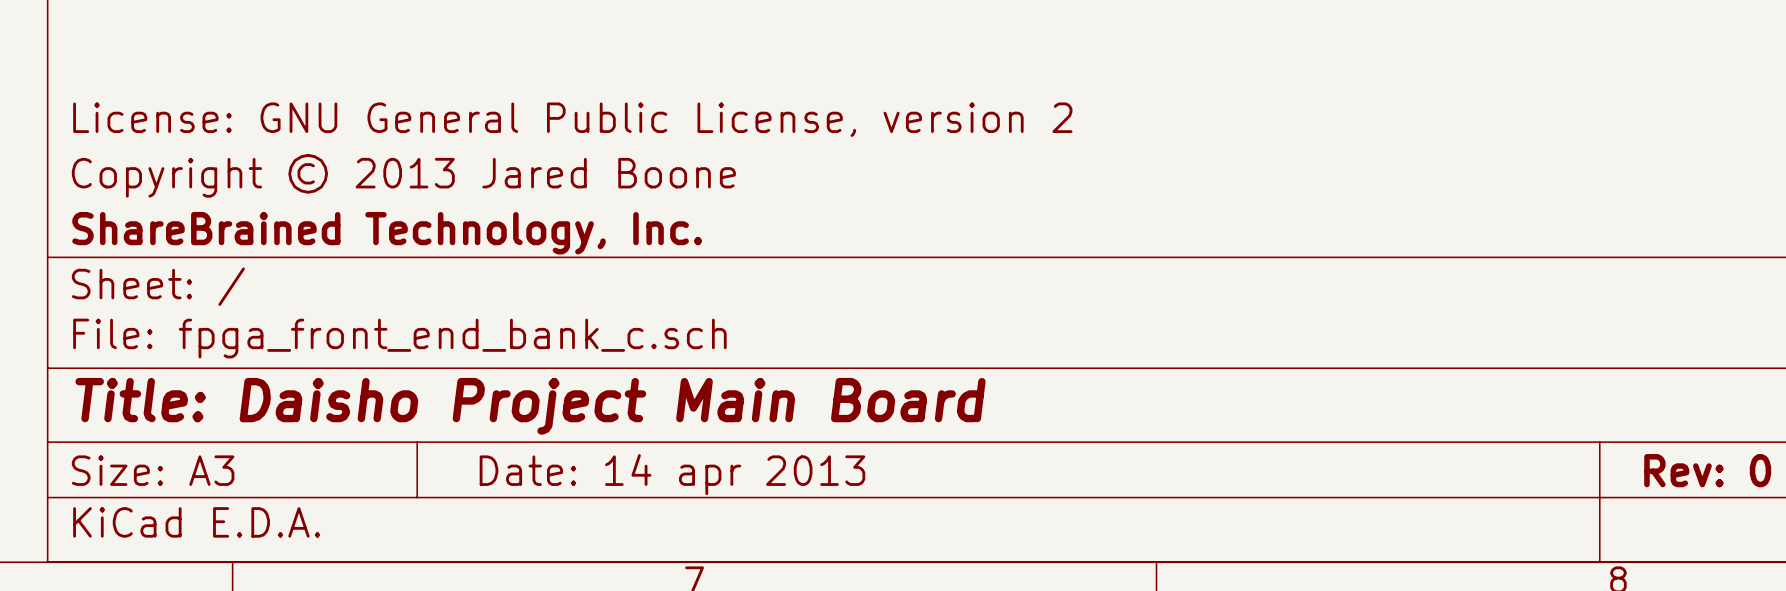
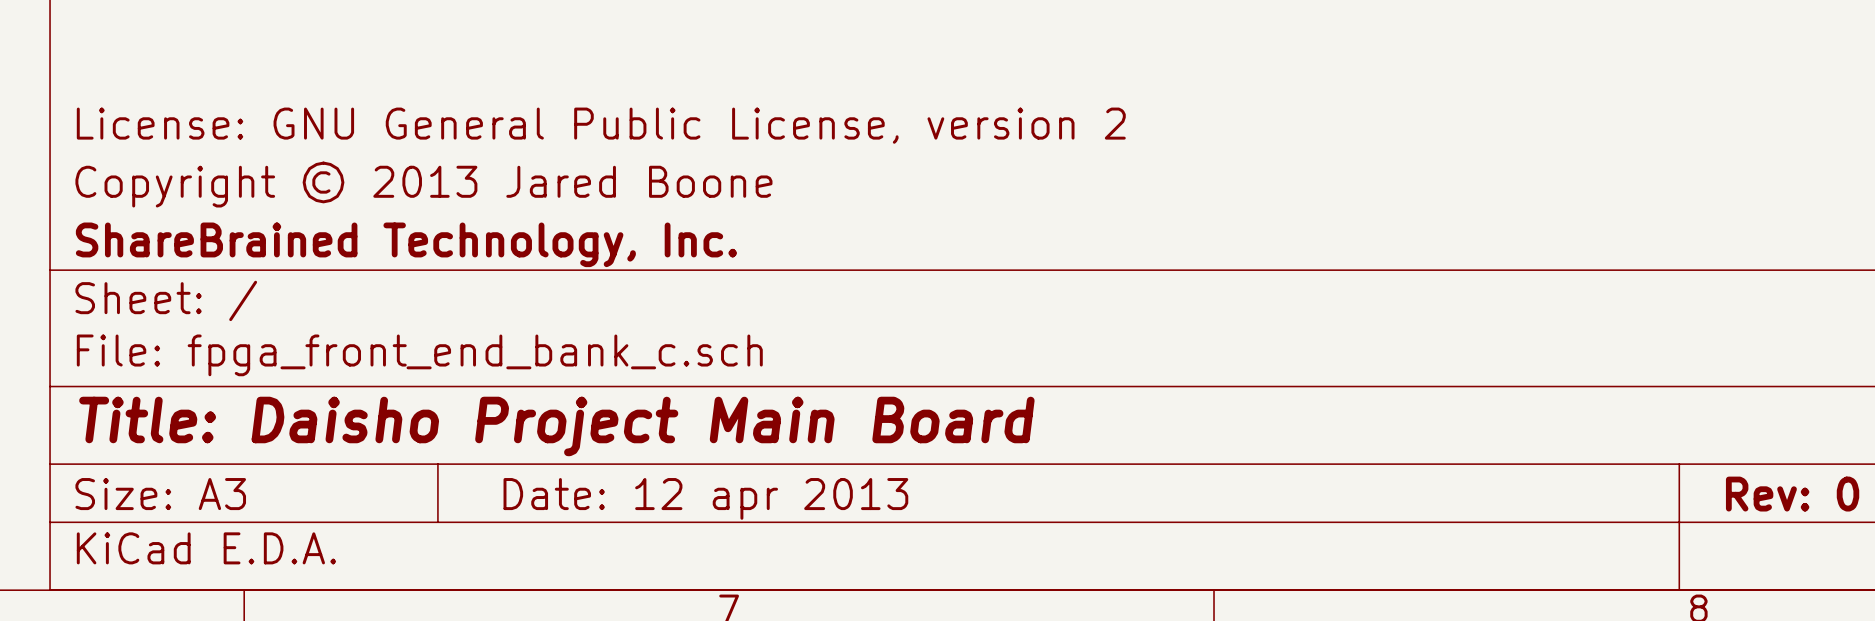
title block: Date: 14 apr 2013 (672, 474) -> Date: 12 apr 2013 (705, 498)

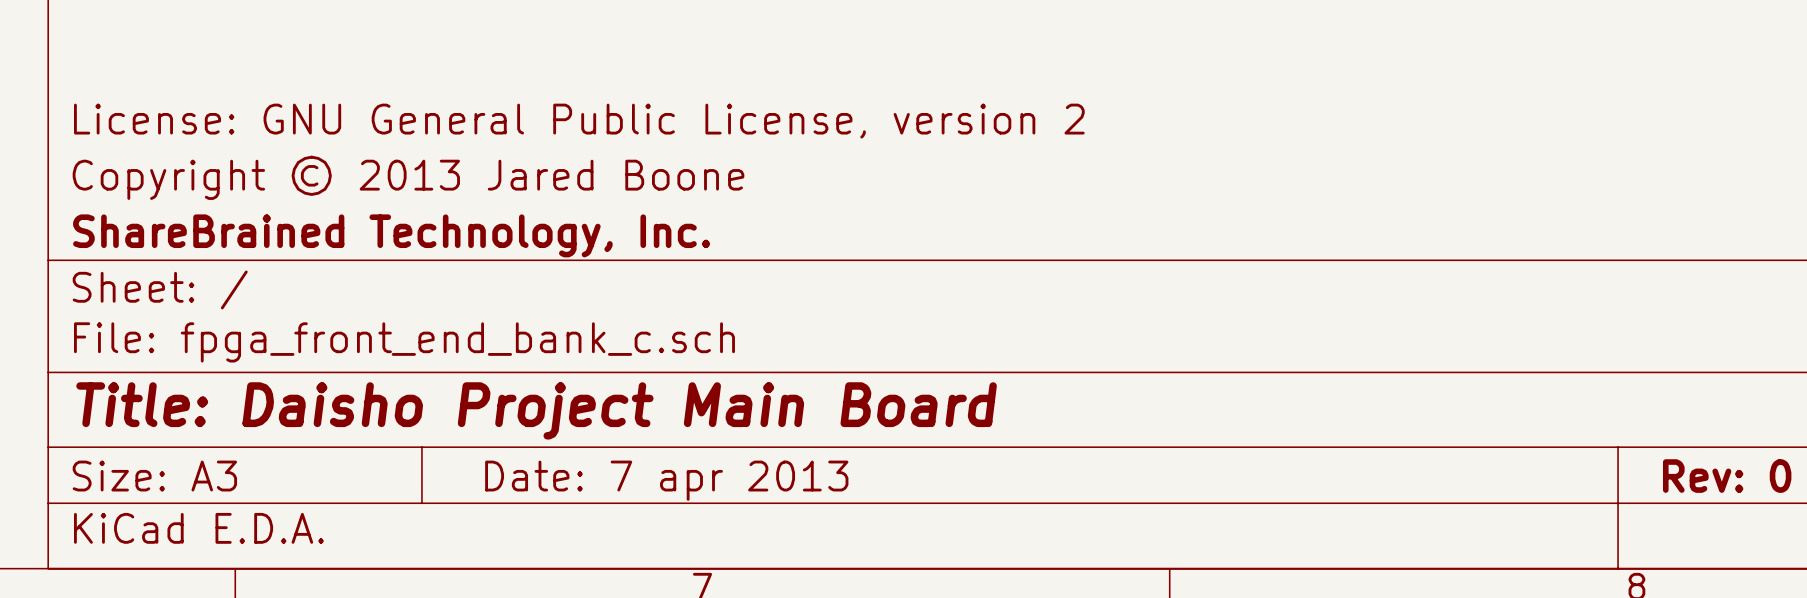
title block: Date: 12 apr 2013 (705, 498) -> Date: 7 apr 2013 (666, 480)

